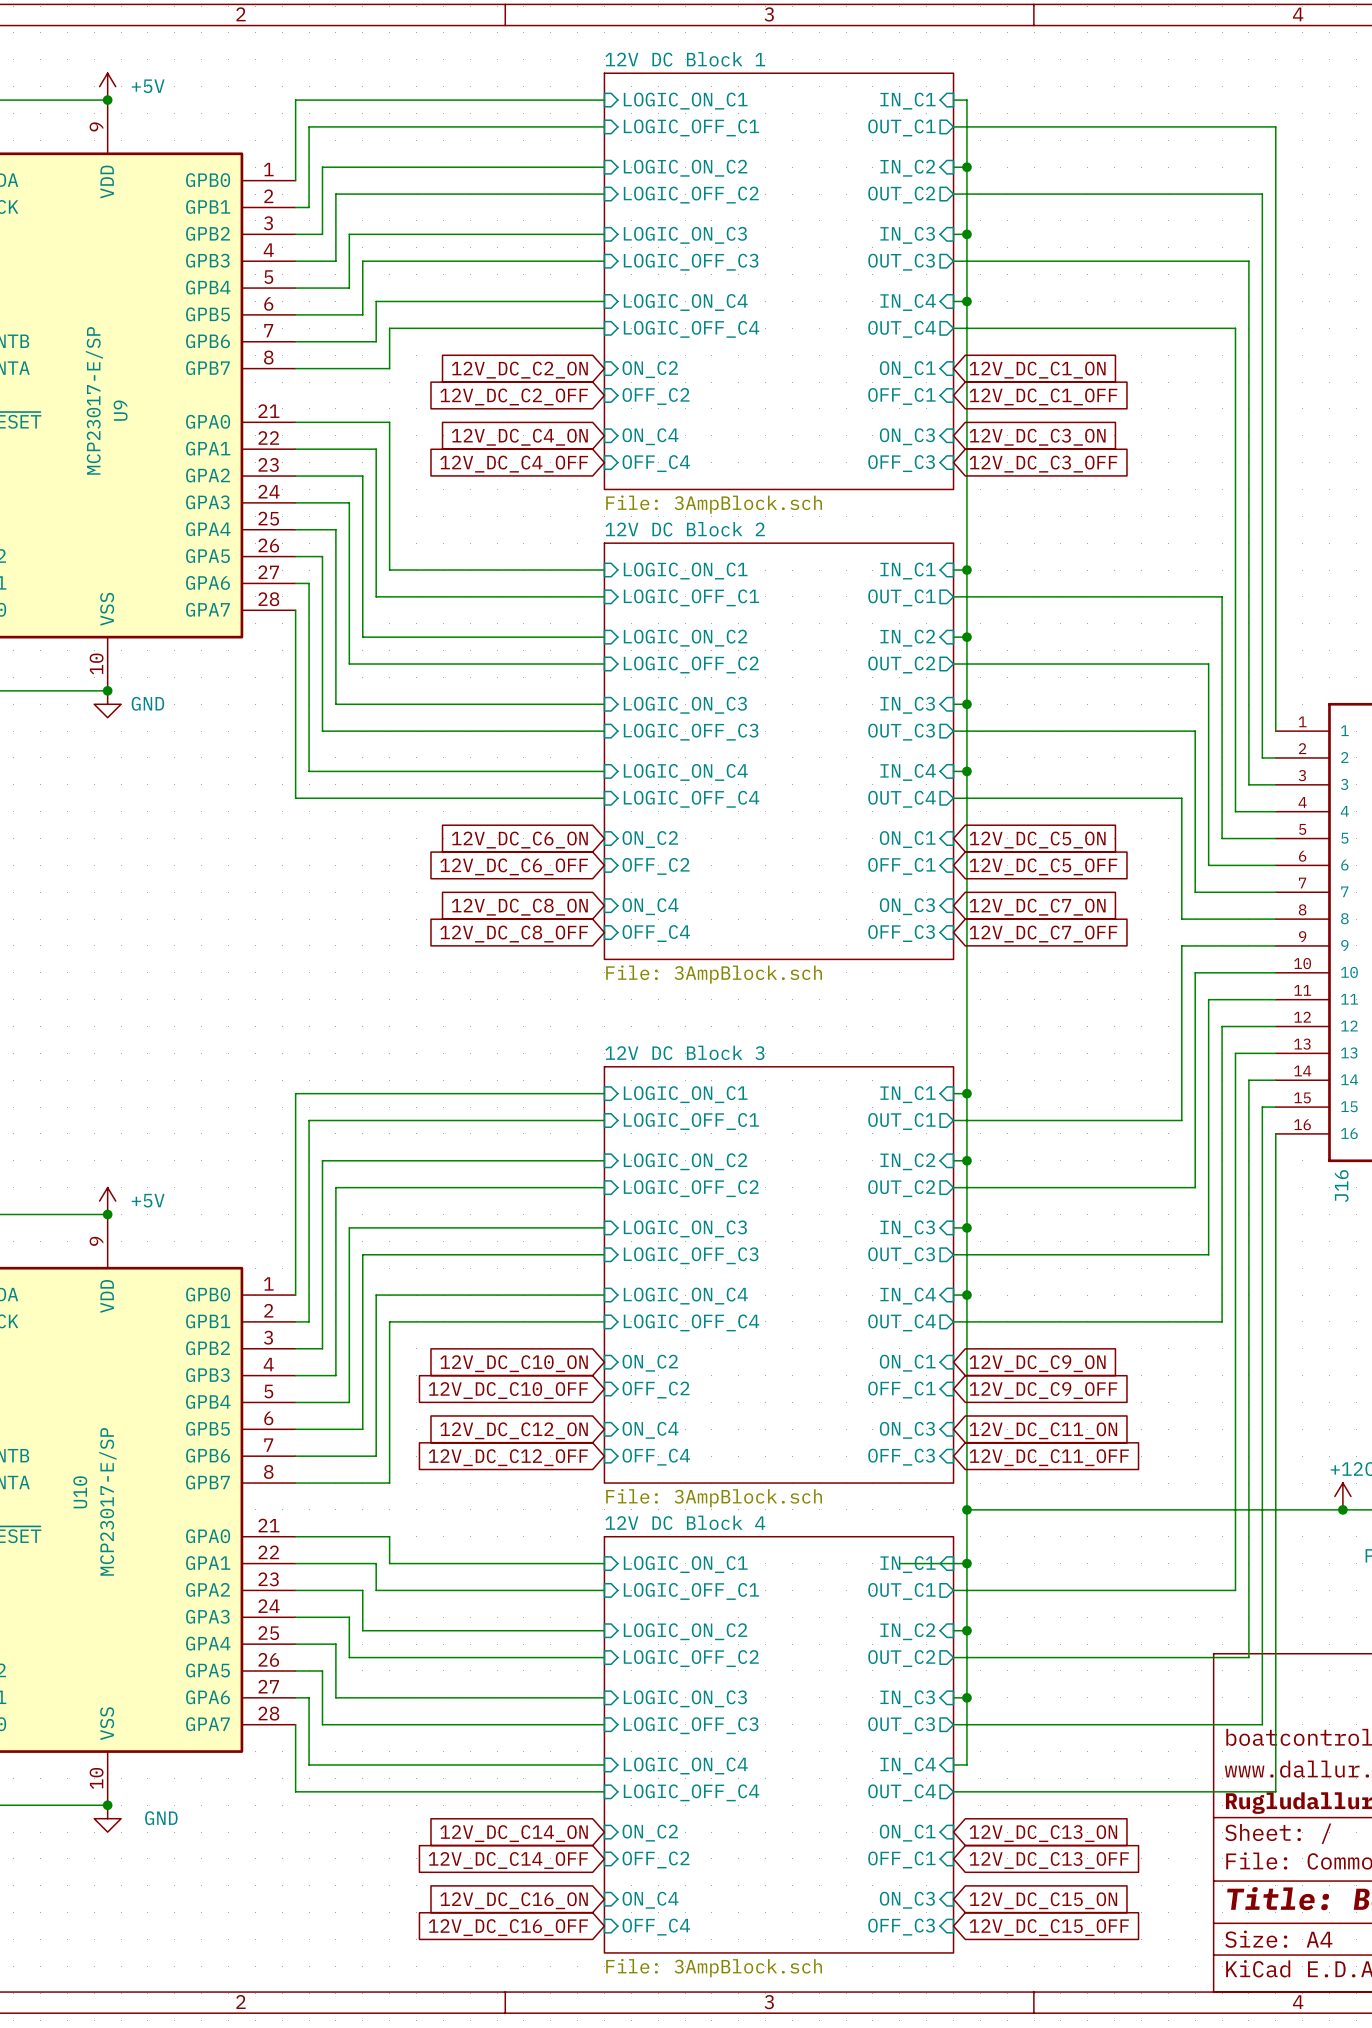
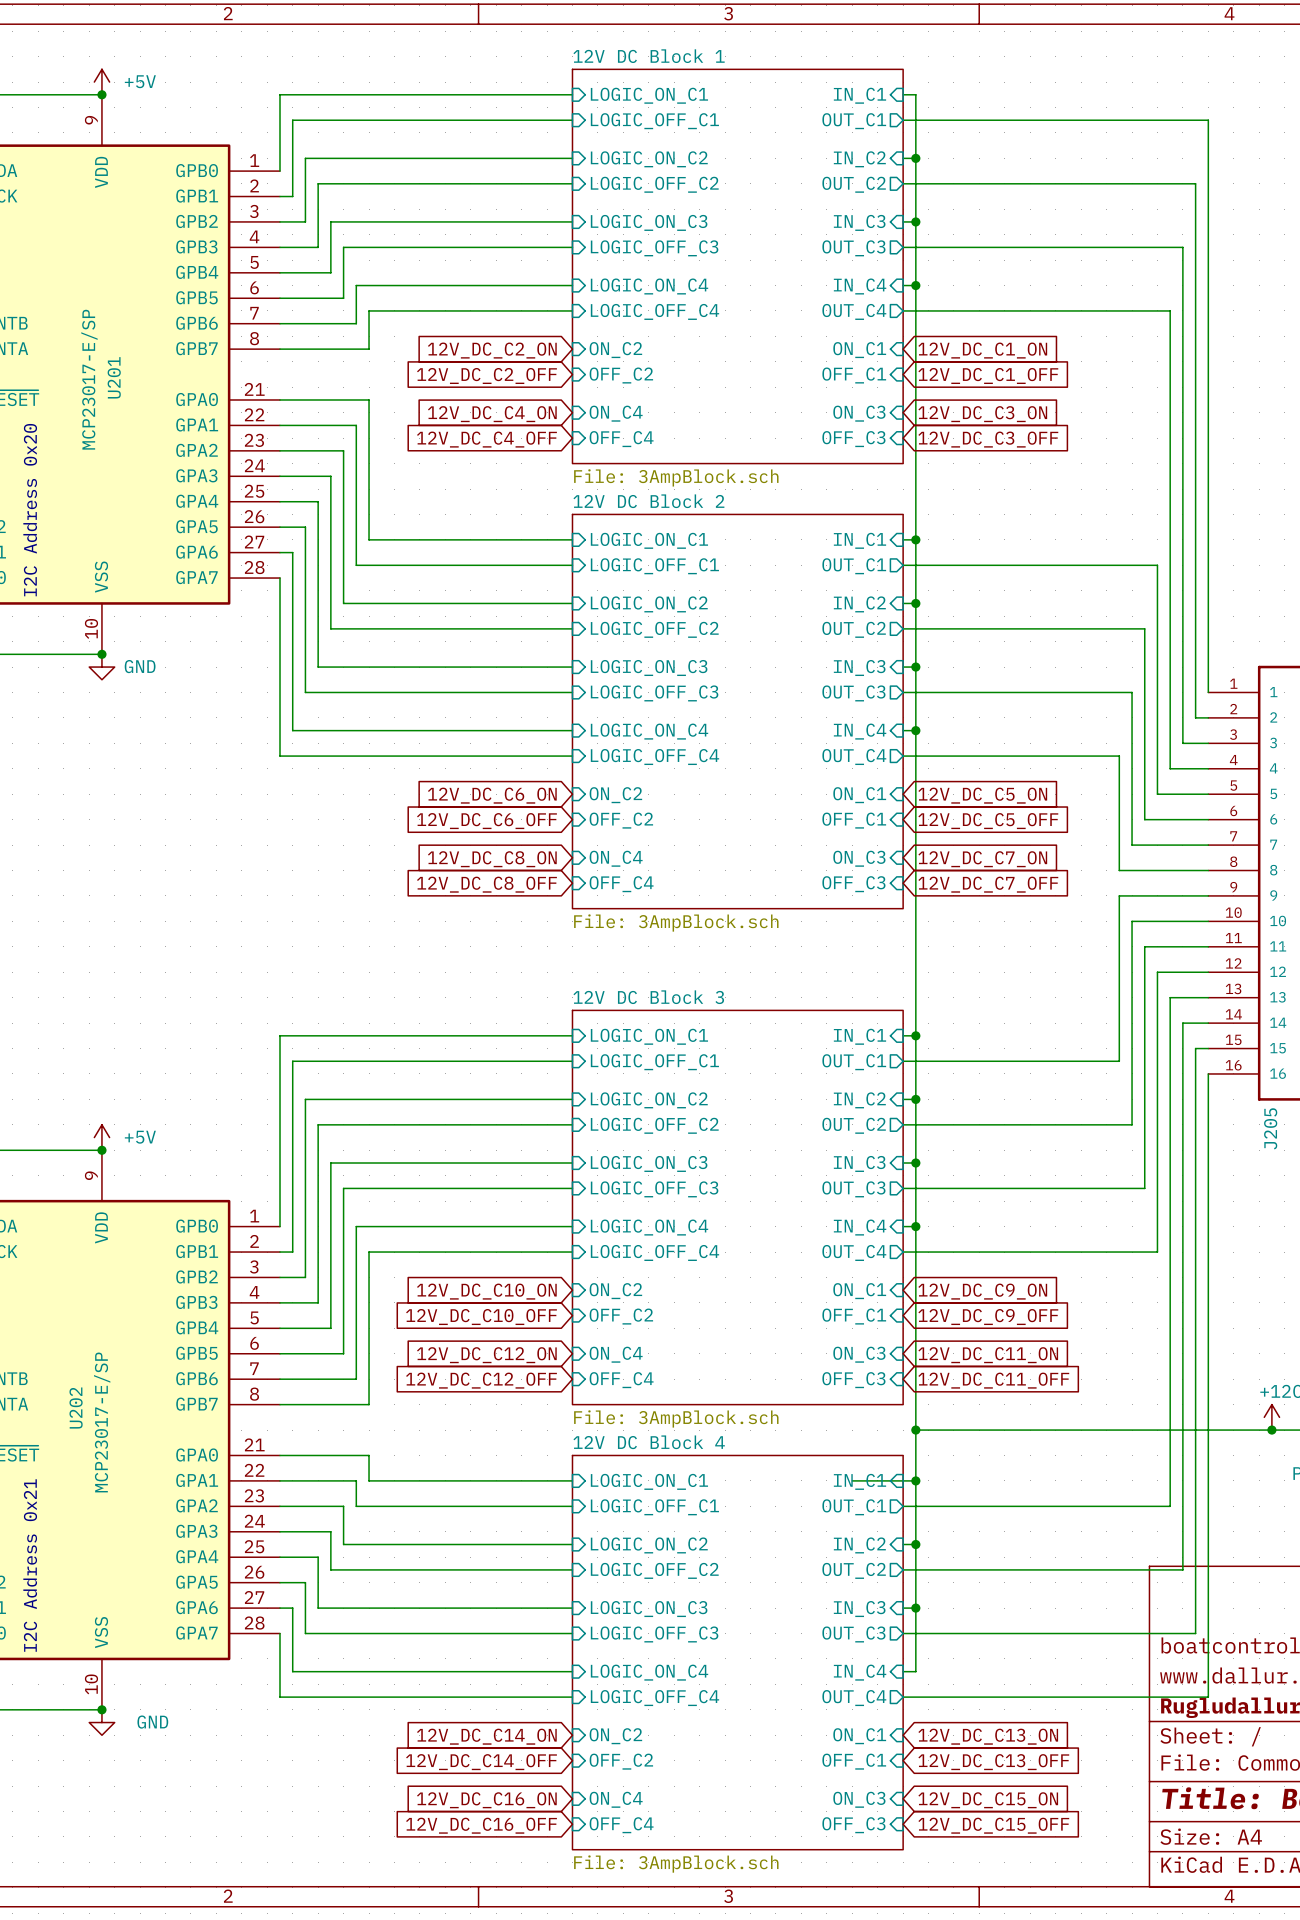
U9 name: U9 (120, 410) -> U201 (114, 377)
text: none -> I2C Address 0x20 (30, 510)
J16 name: J16 (1341, 1186) -> J205 (1270, 1128)
U10 name: U10 (80, 1492) -> U202 (76, 1408)
text: none -> I2C Address 0x21 (30, 1565)

